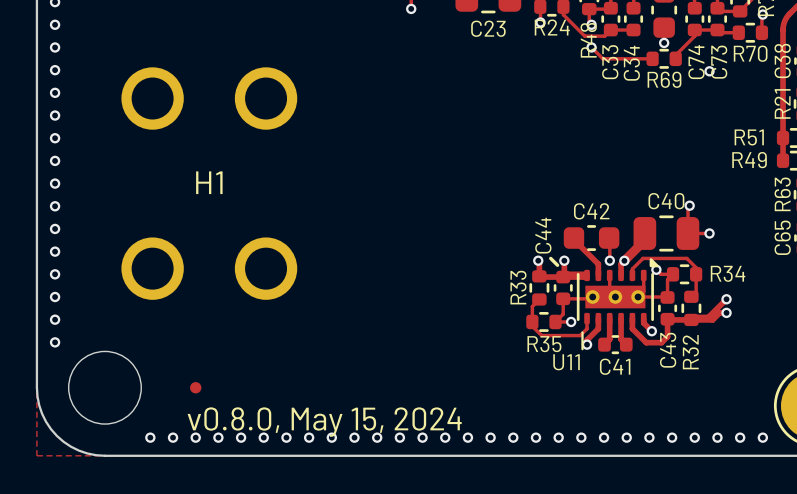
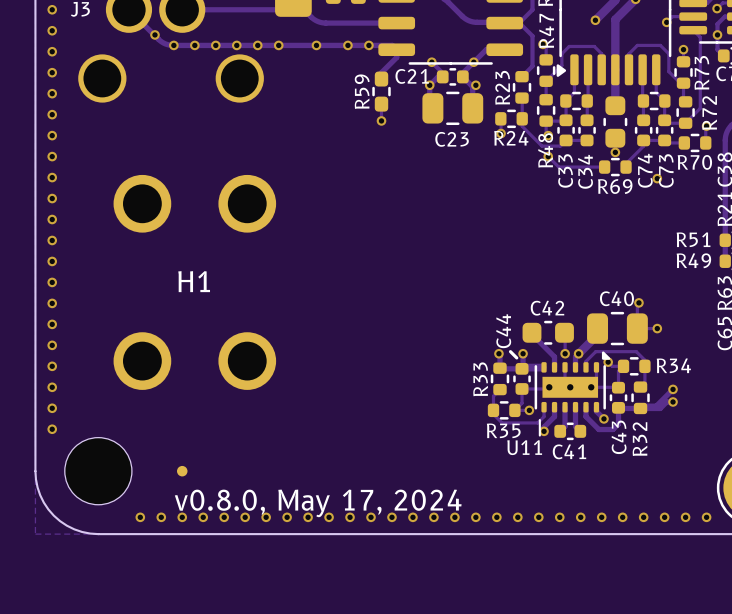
text: v0.8.0, May 15, 2024 (324, 422) -> v0.8.0, May 17, 2024 (318, 503)

